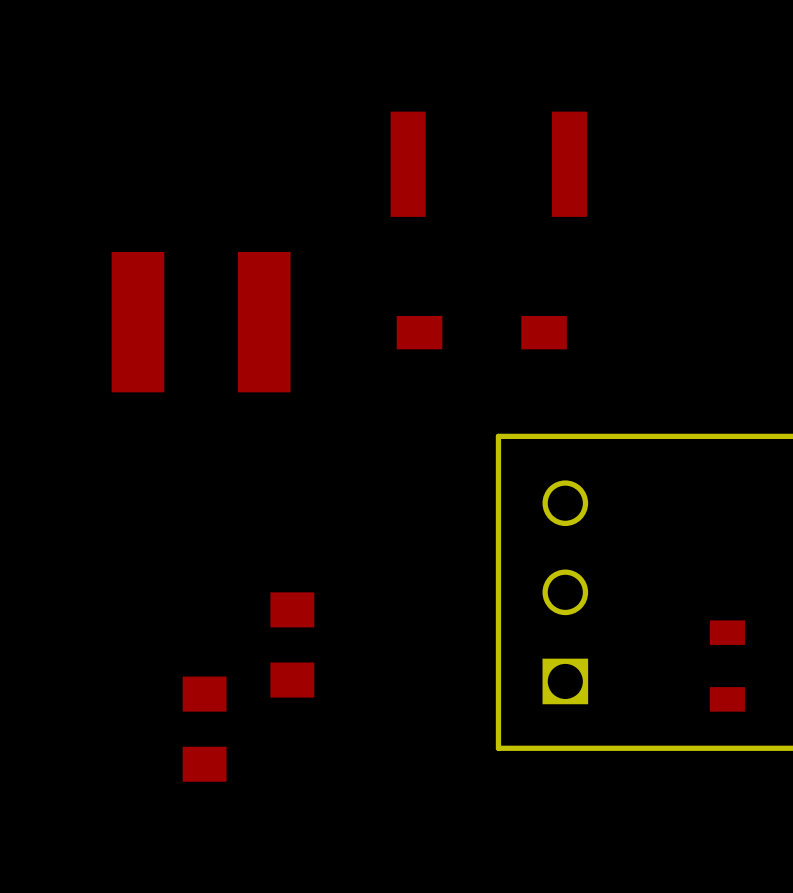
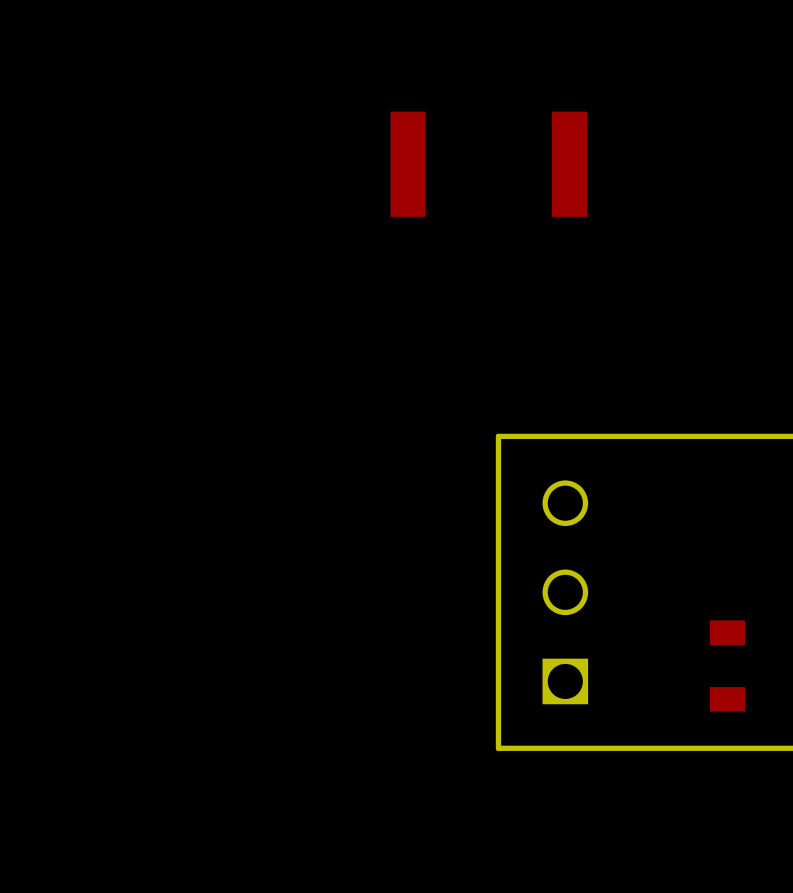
part: (201, 322) -> none
part: (481, 332) -> none
part: (292, 644) -> none
part: (204, 729) -> none

